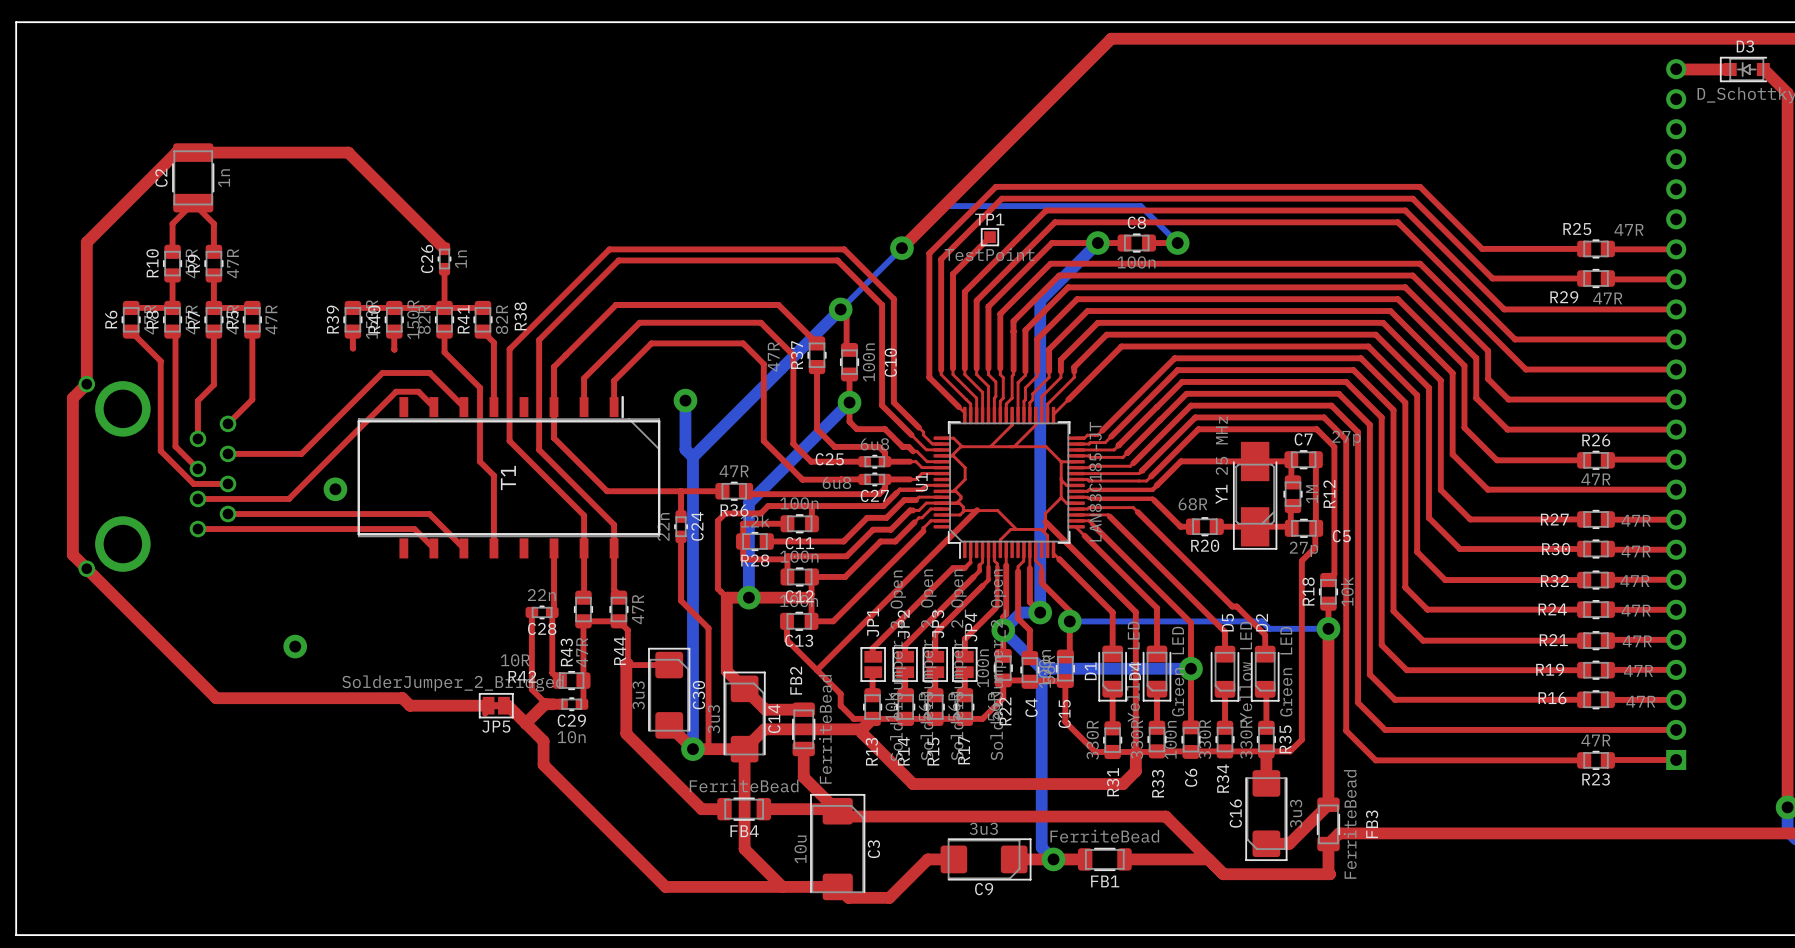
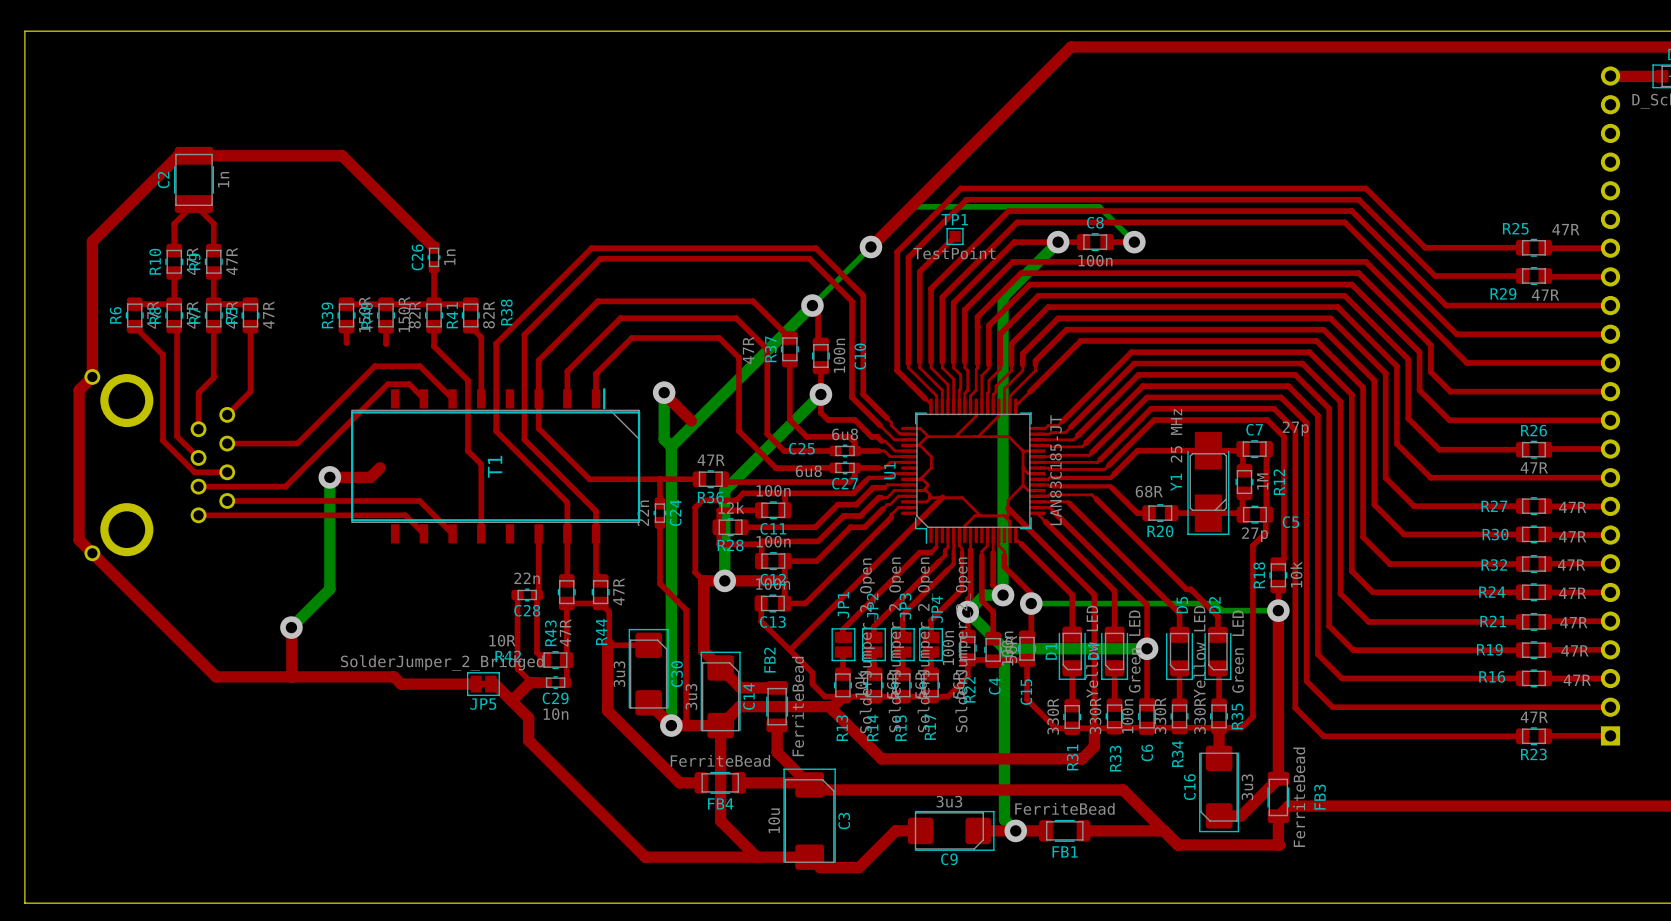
top track: none -> (664, 392) (691, 420)
top track: none -> (380, 467) (370, 477) (329, 477)
bottom track: none -> (329, 477) (329, 589) (291, 627)
top track: none -> (291, 627) (291, 676)
top track: (485, 712) (485, 713) -> none

